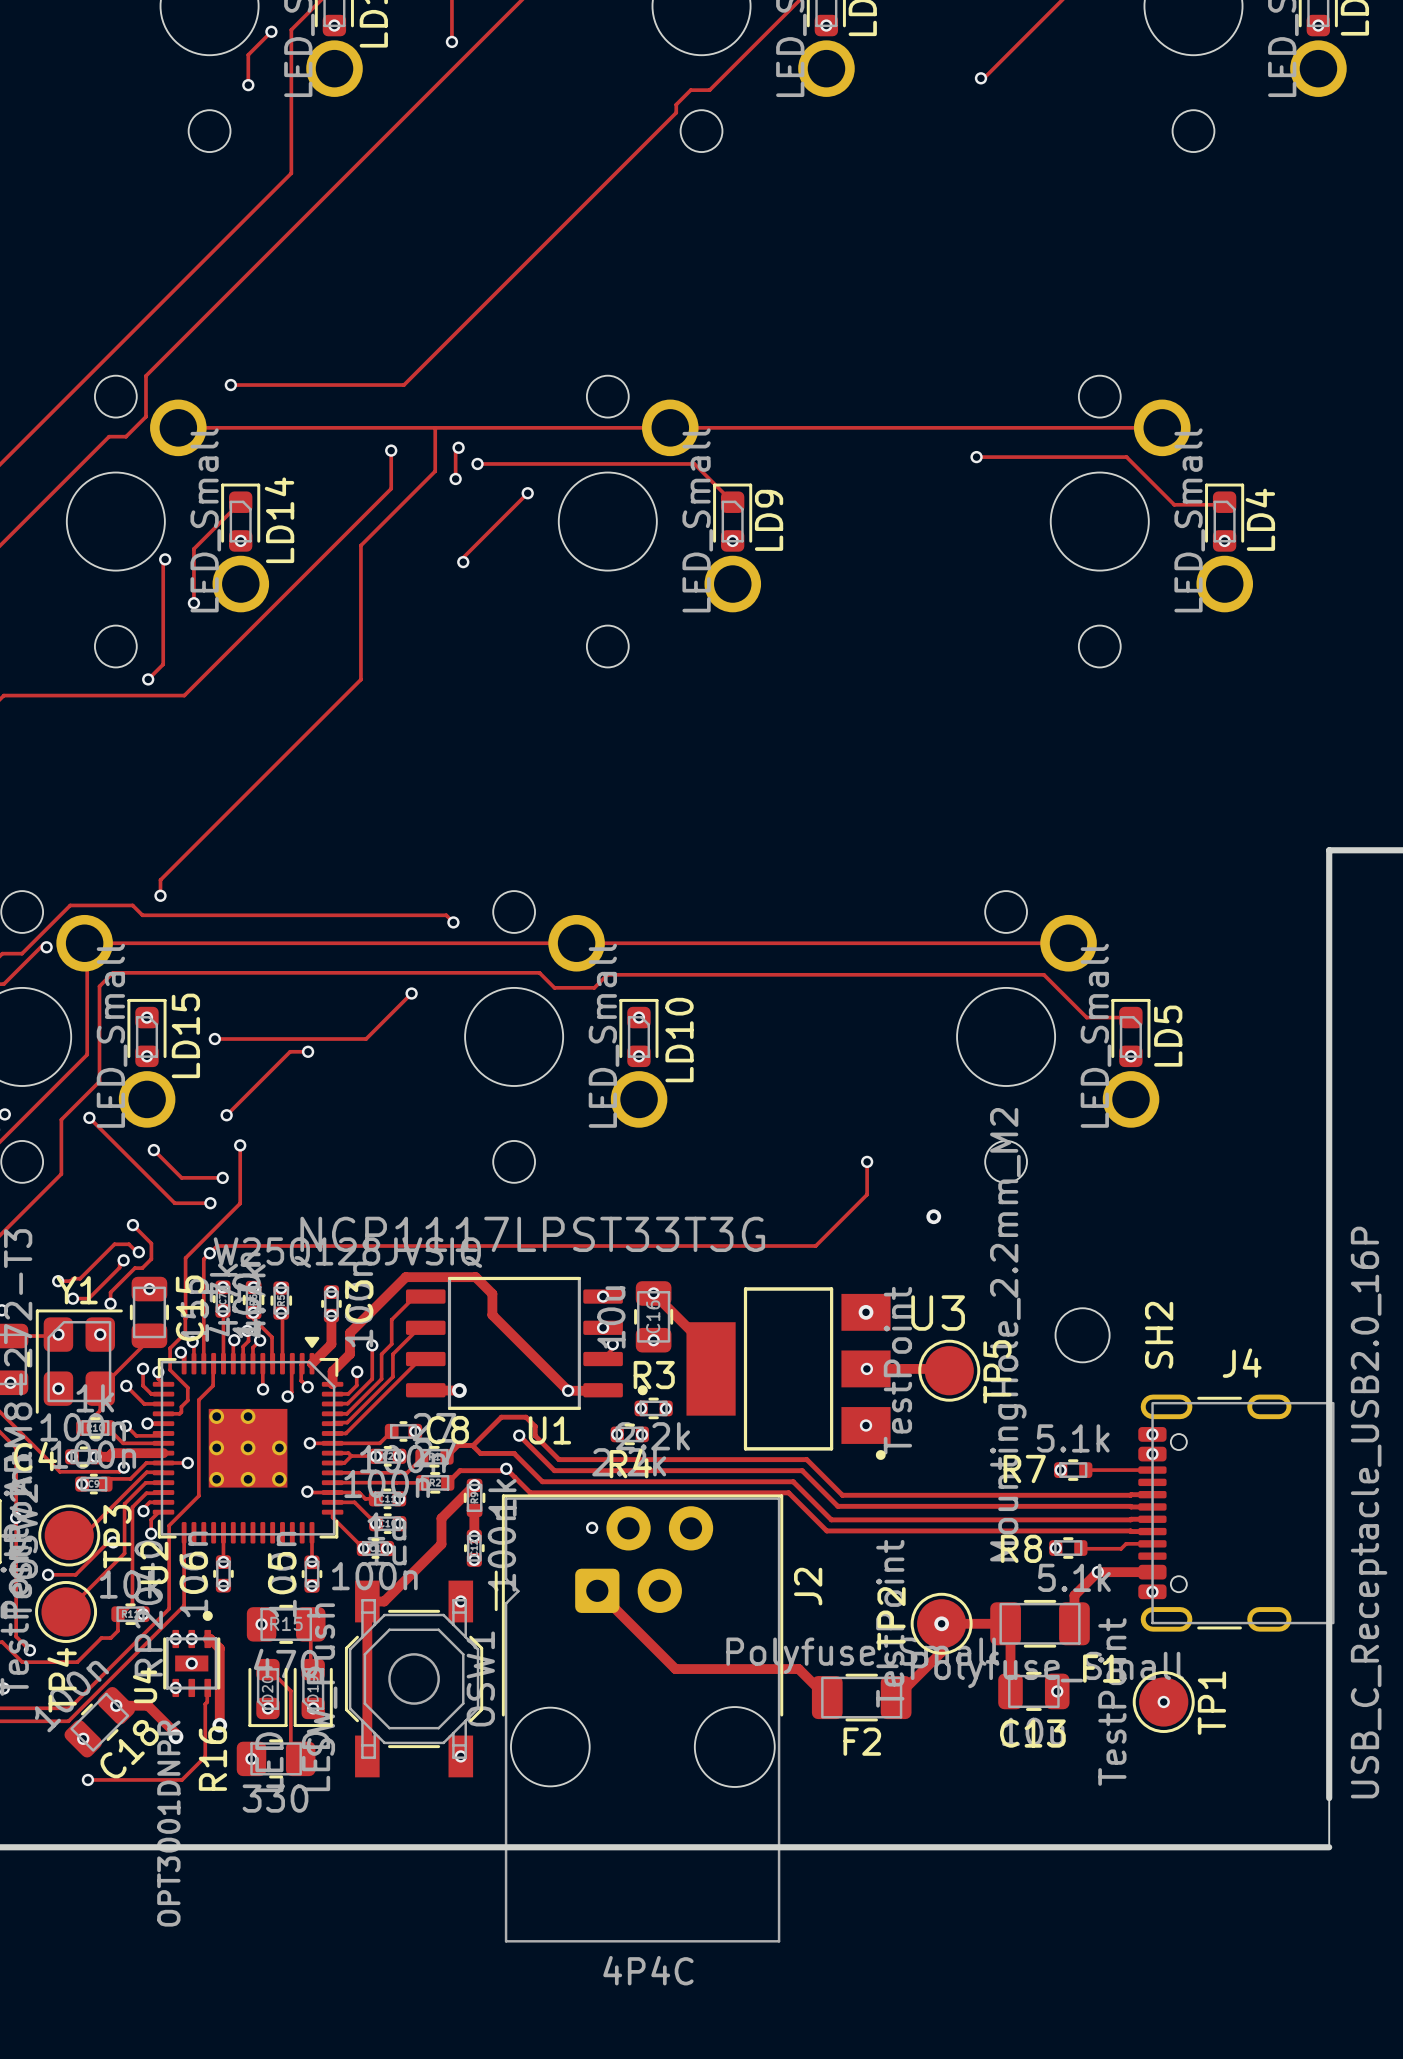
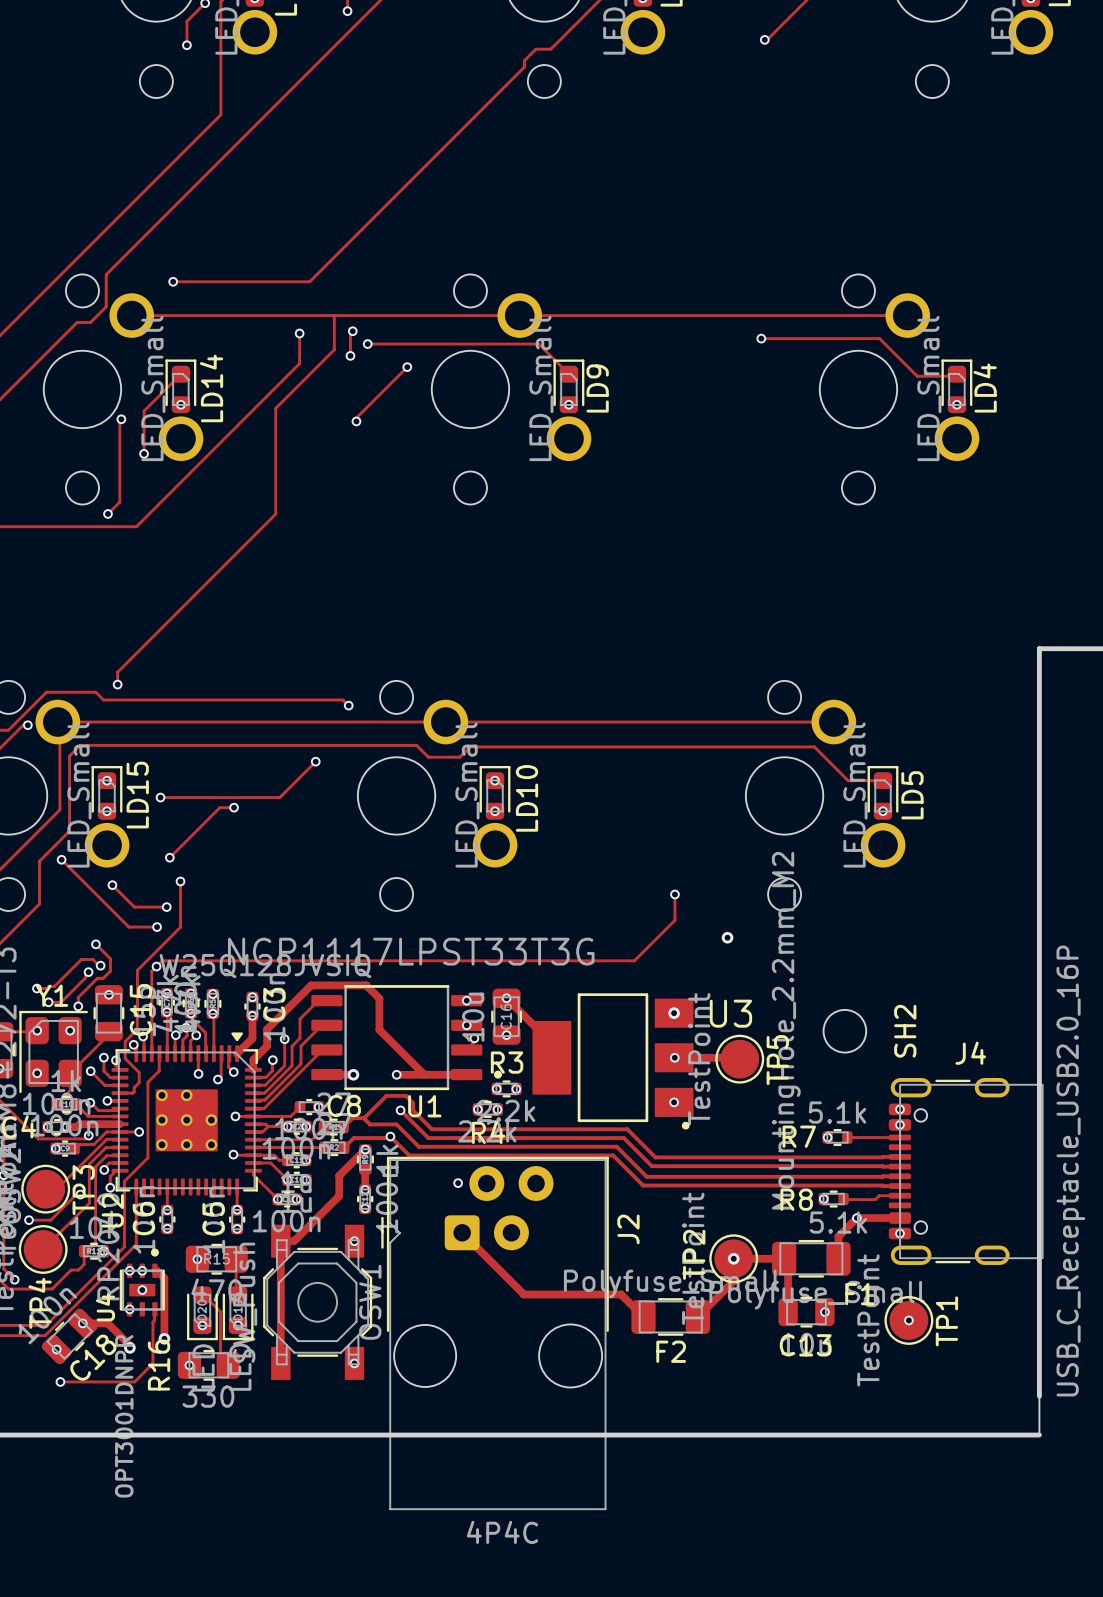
track: (492, 1315) (568, 1390) (602, 1390) -> (379, 1015) (379, 1029) (424, 1074)
track: none -> (396, 1074) (466, 1074)
via position: (568, 1390) -> (396, 1074)

